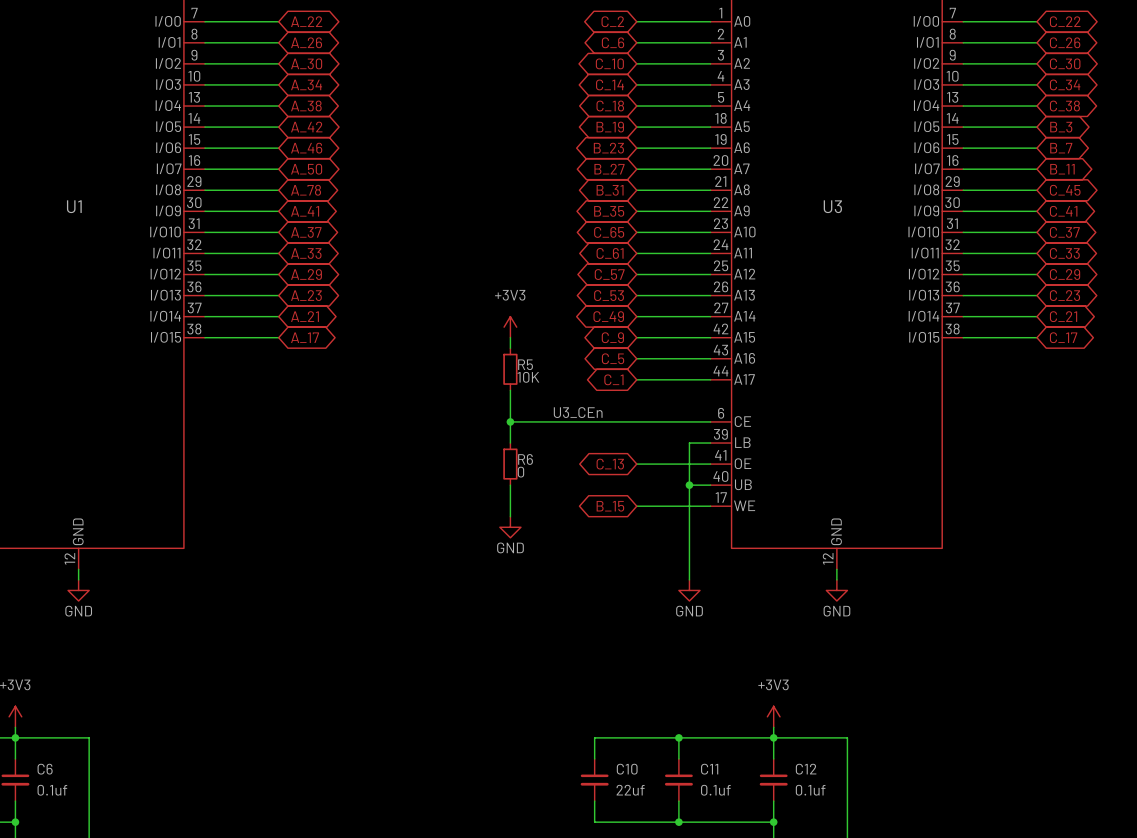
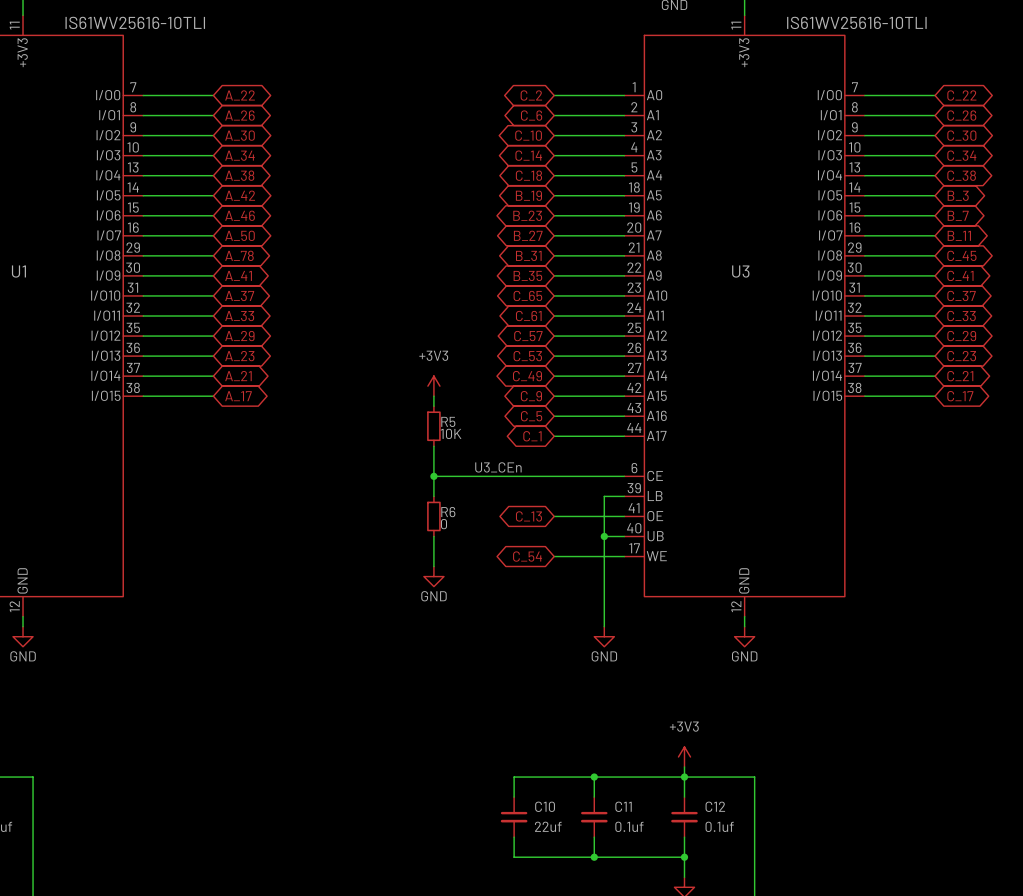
global label: B_15 (610, 506) -> C_54 (527, 556)

